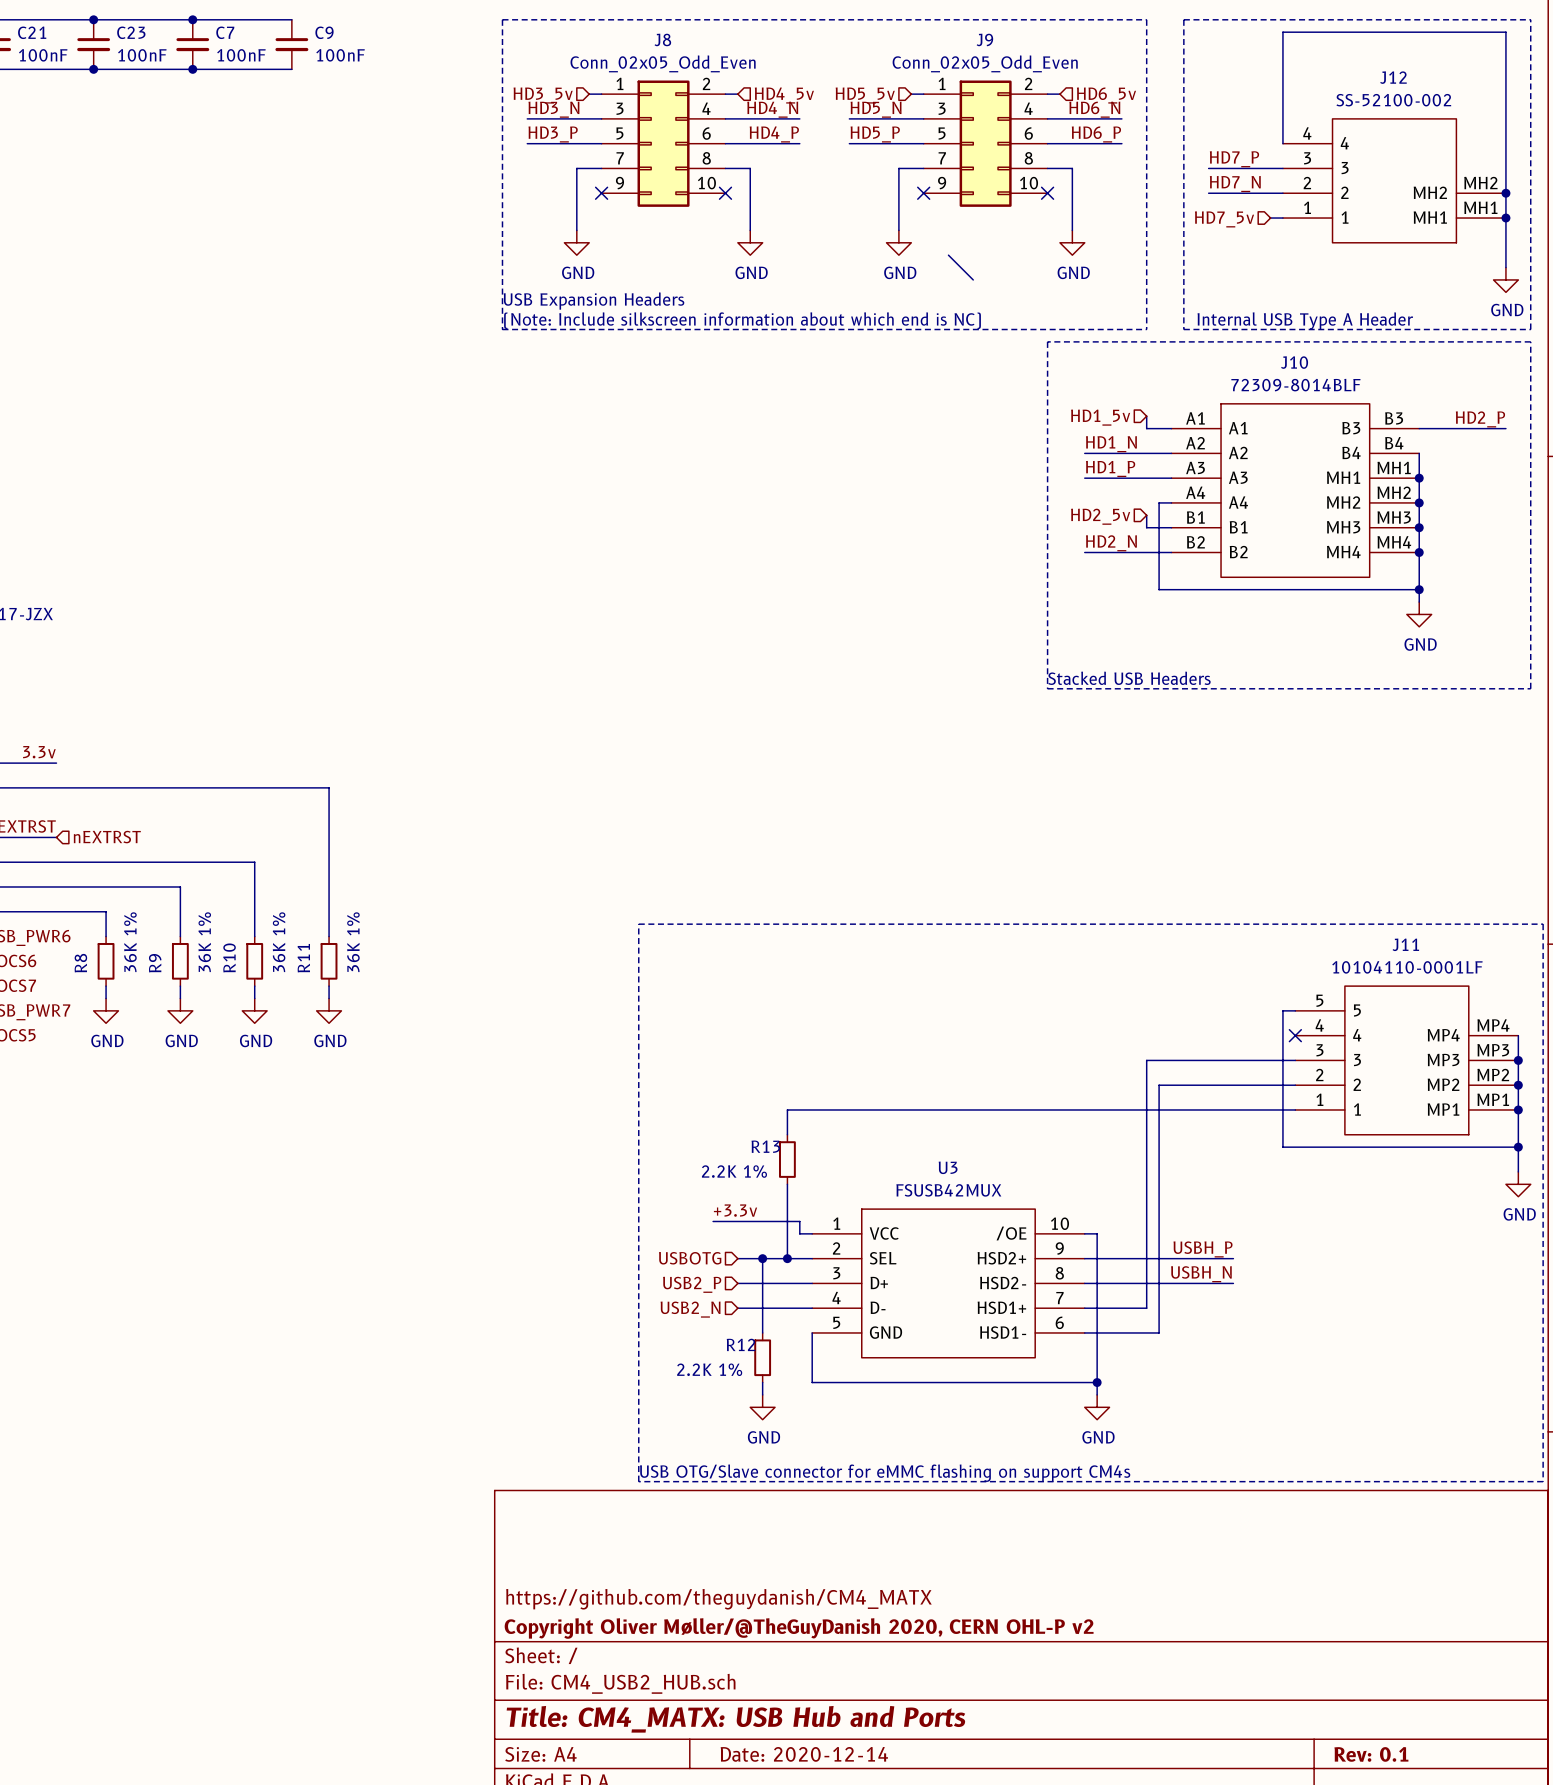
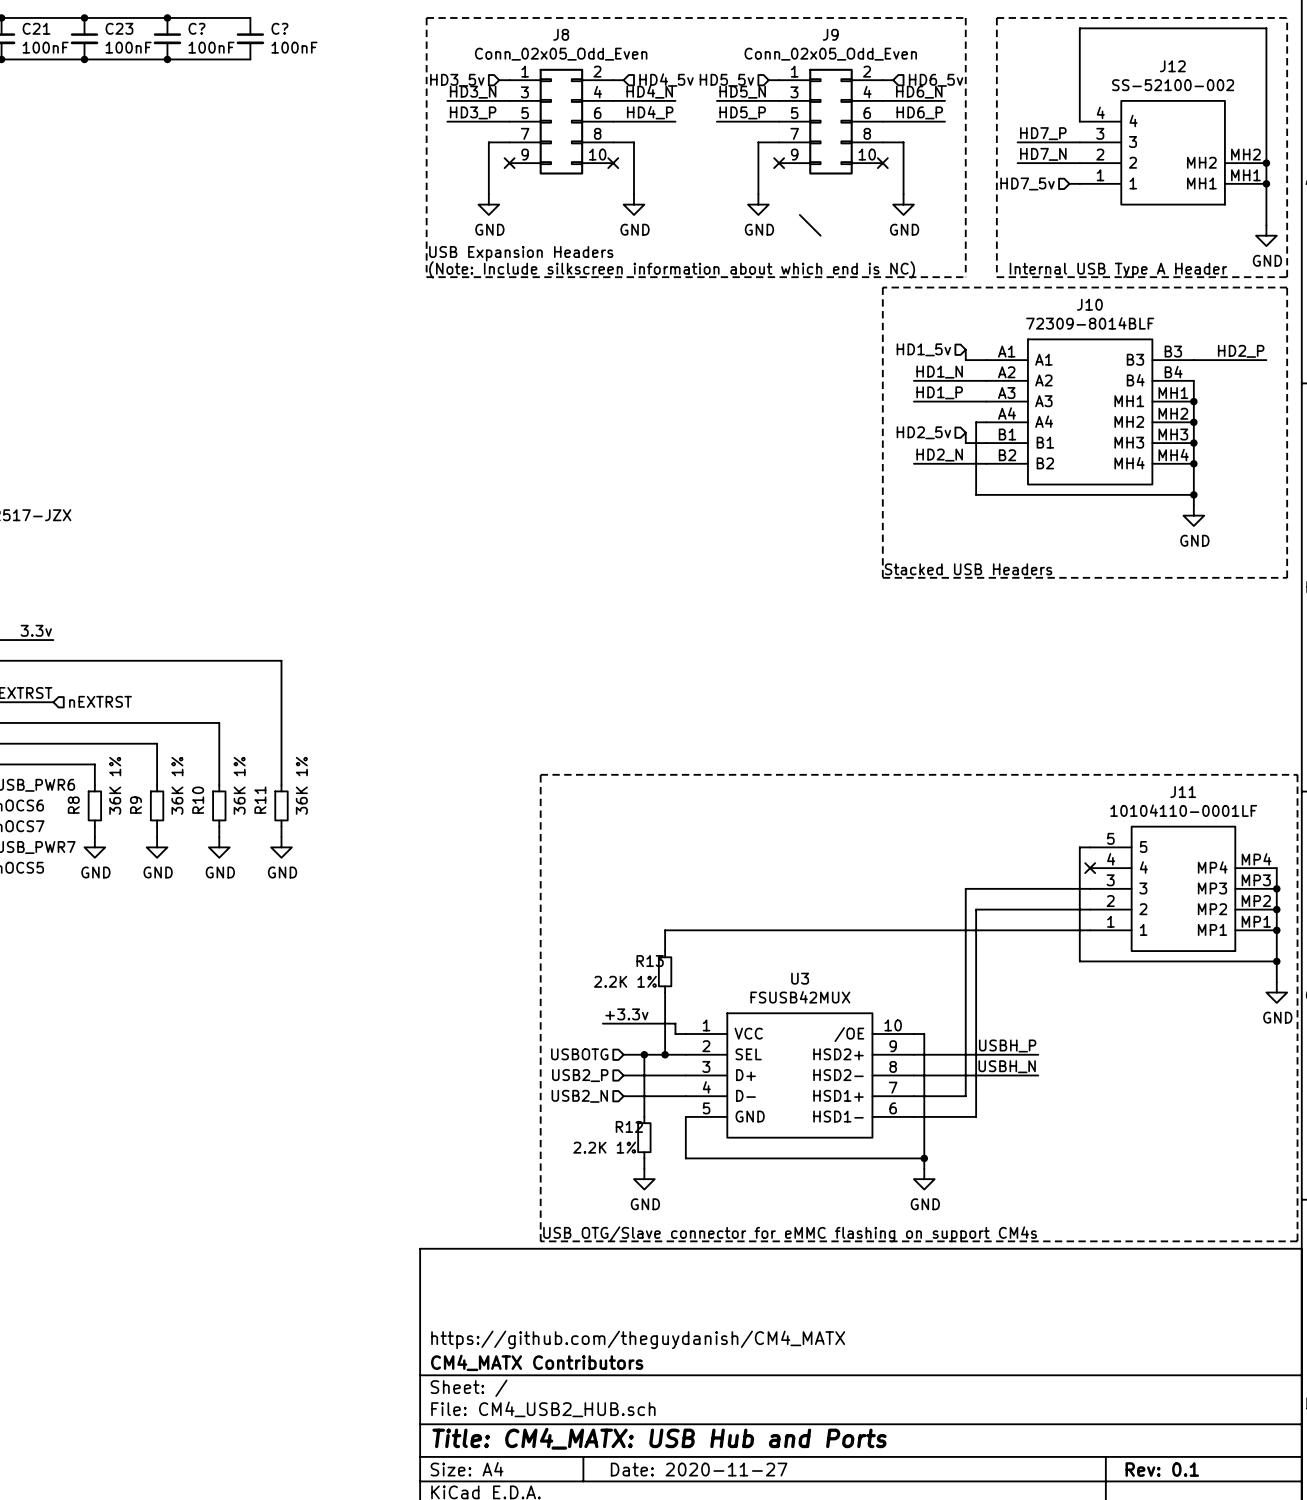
C7 name: C7 (225, 32) -> C? (196, 28)
C9 name: C9 (324, 32) -> C? (279, 28)
title block: Copyright Oliver Møller/@TheGuyDanish 2020, CERN OHL-P v2 (799, 1628) -> CM4_MATX Contributors (537, 1362)
title block: Date: 2020-12-14 (804, 1754) -> Date: 2020-11-27 (699, 1469)

